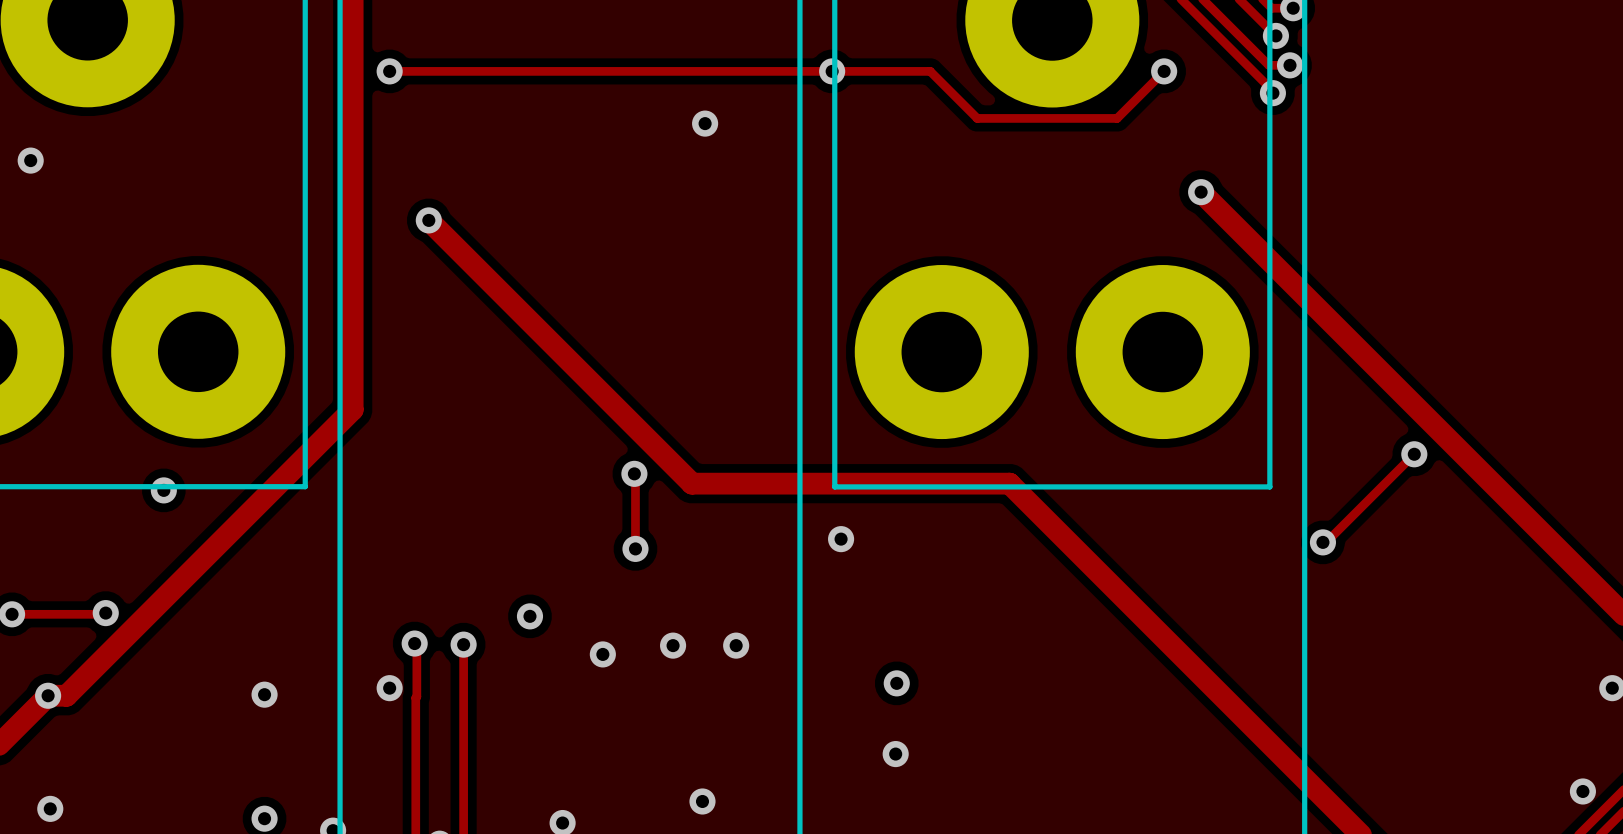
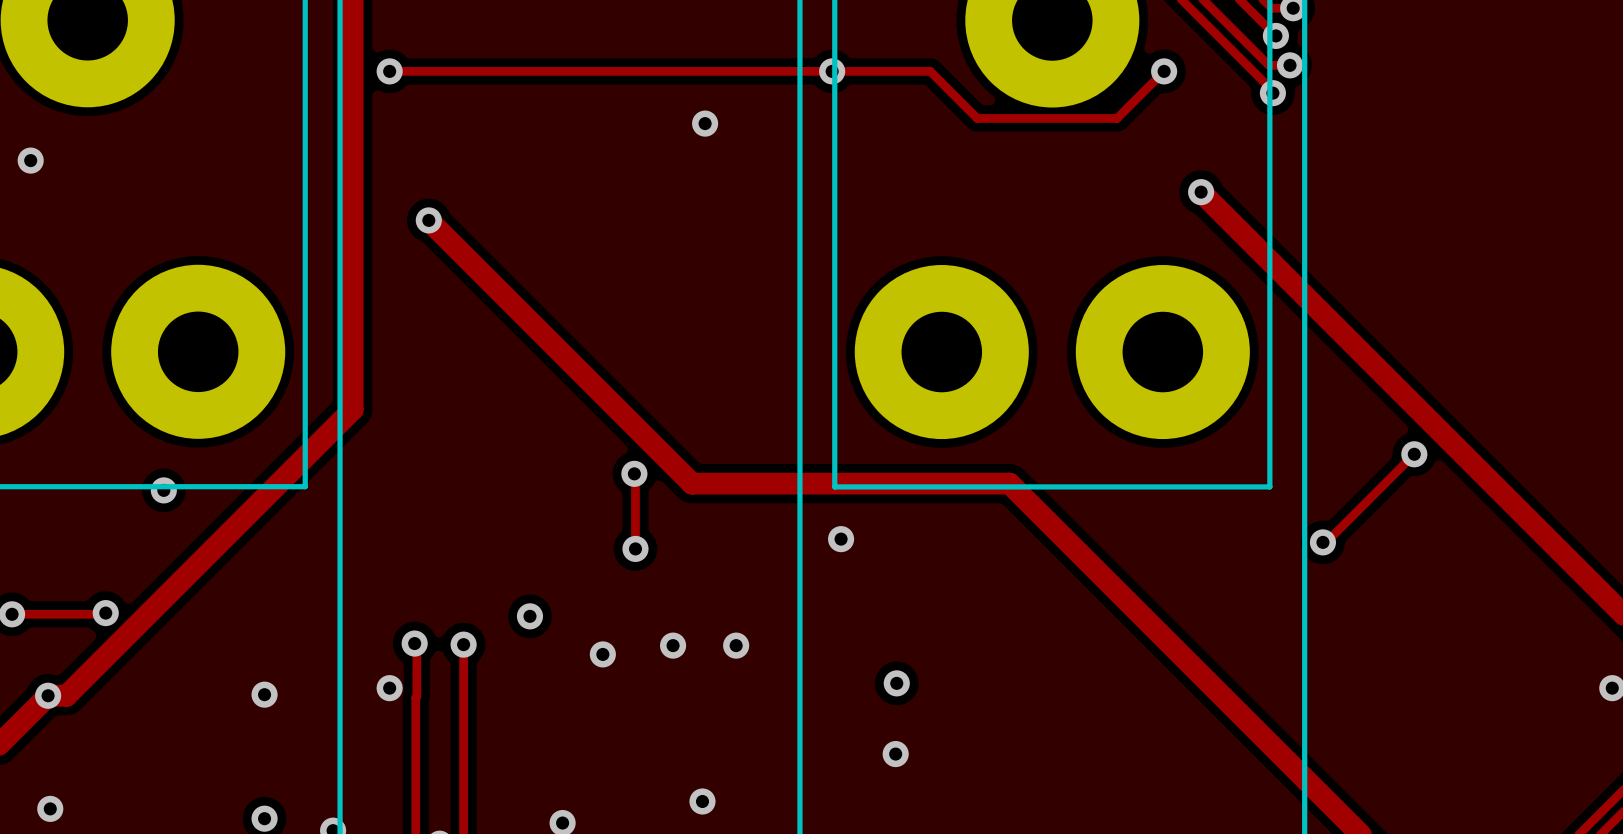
via: (1582, 791) -> none

